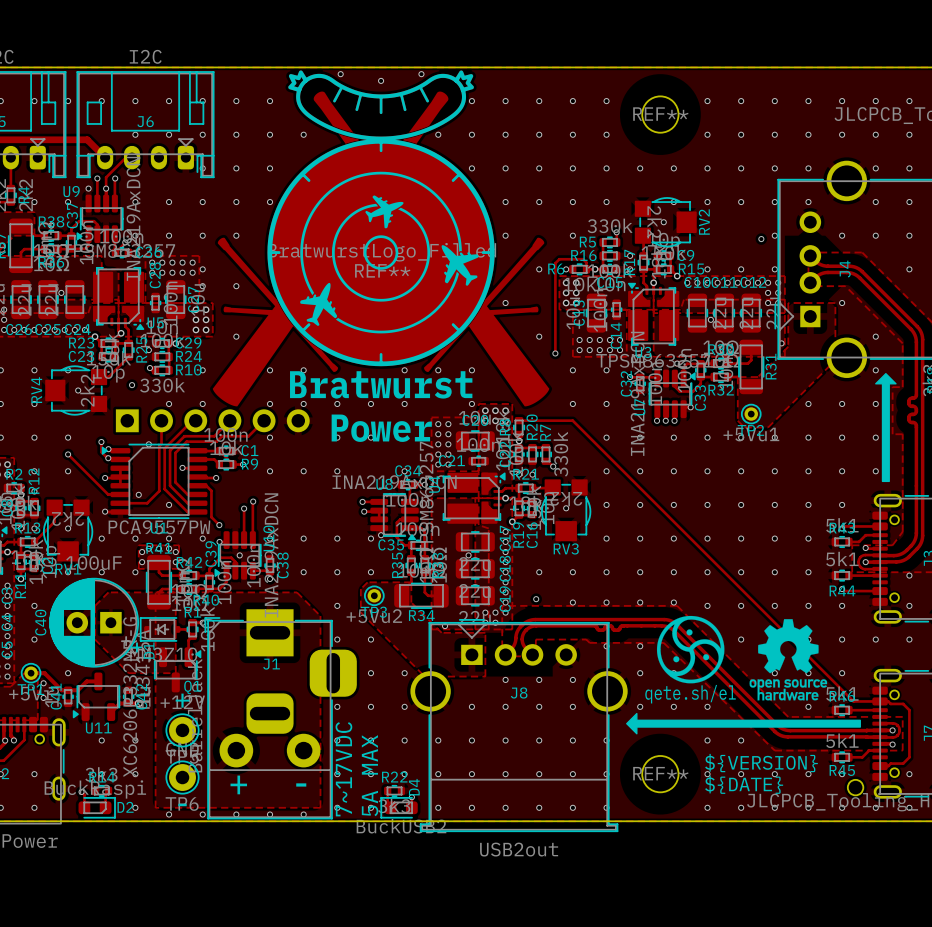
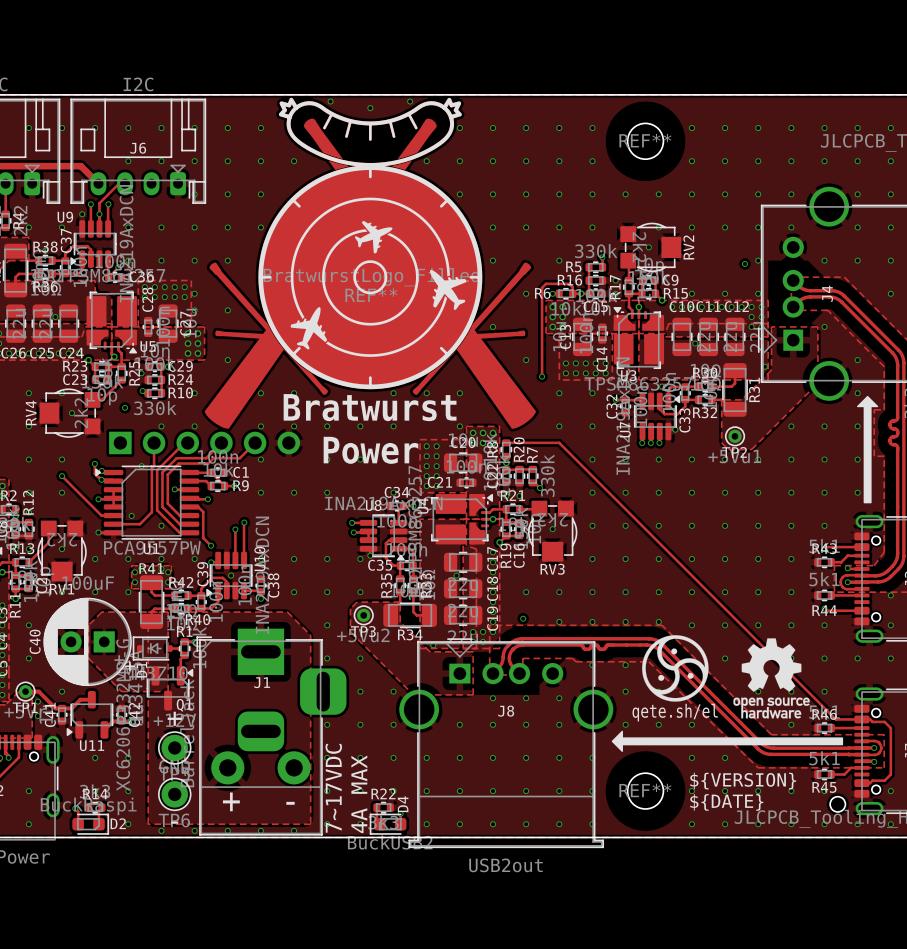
text: 5A MAX (370, 775) -> 4A MAX (359, 794)

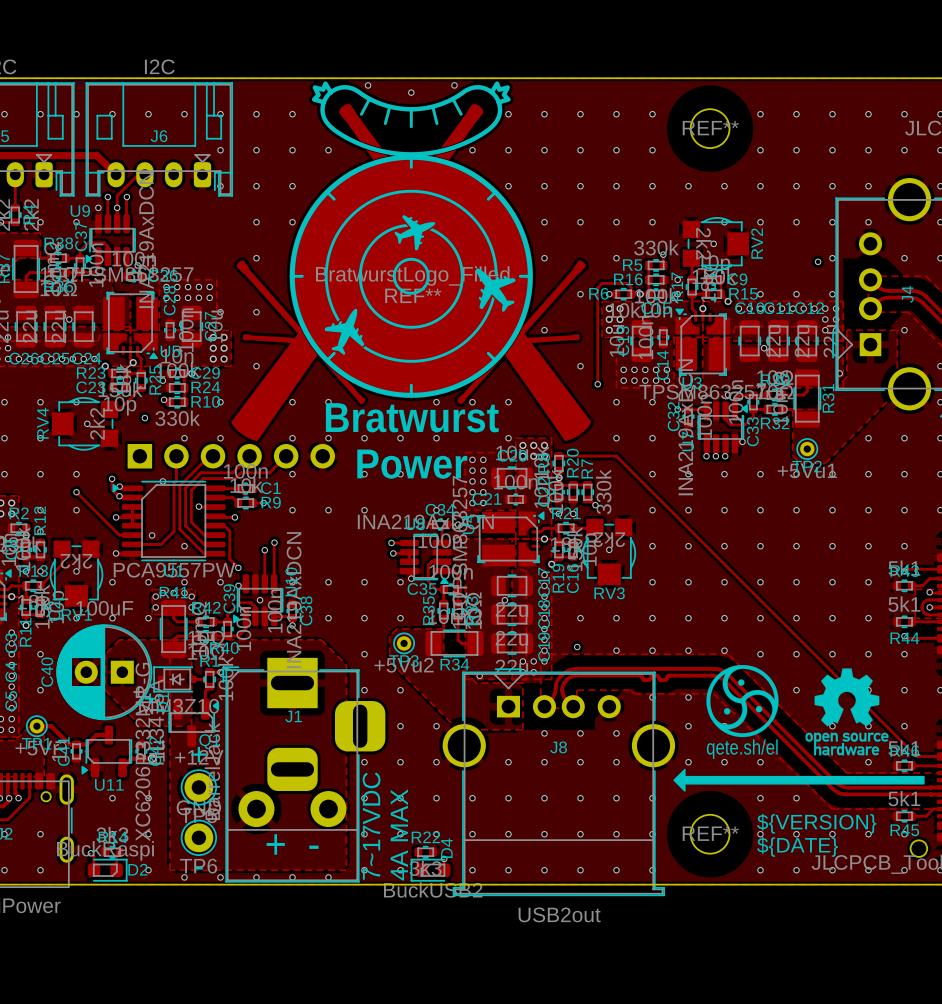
via: (128, 161) -> none
via: (161, 161) -> none
via: (128, 227) -> none
via: (161, 227) -> none
via: (194, 227) -> none
via: (128, 260) -> none
via: (161, 260) -> none
via: (194, 260) -> none
via: (194, 293) -> none
via: (62, 691) -> none
via: (37, 701) -> none
via: (37, 716) -> none

